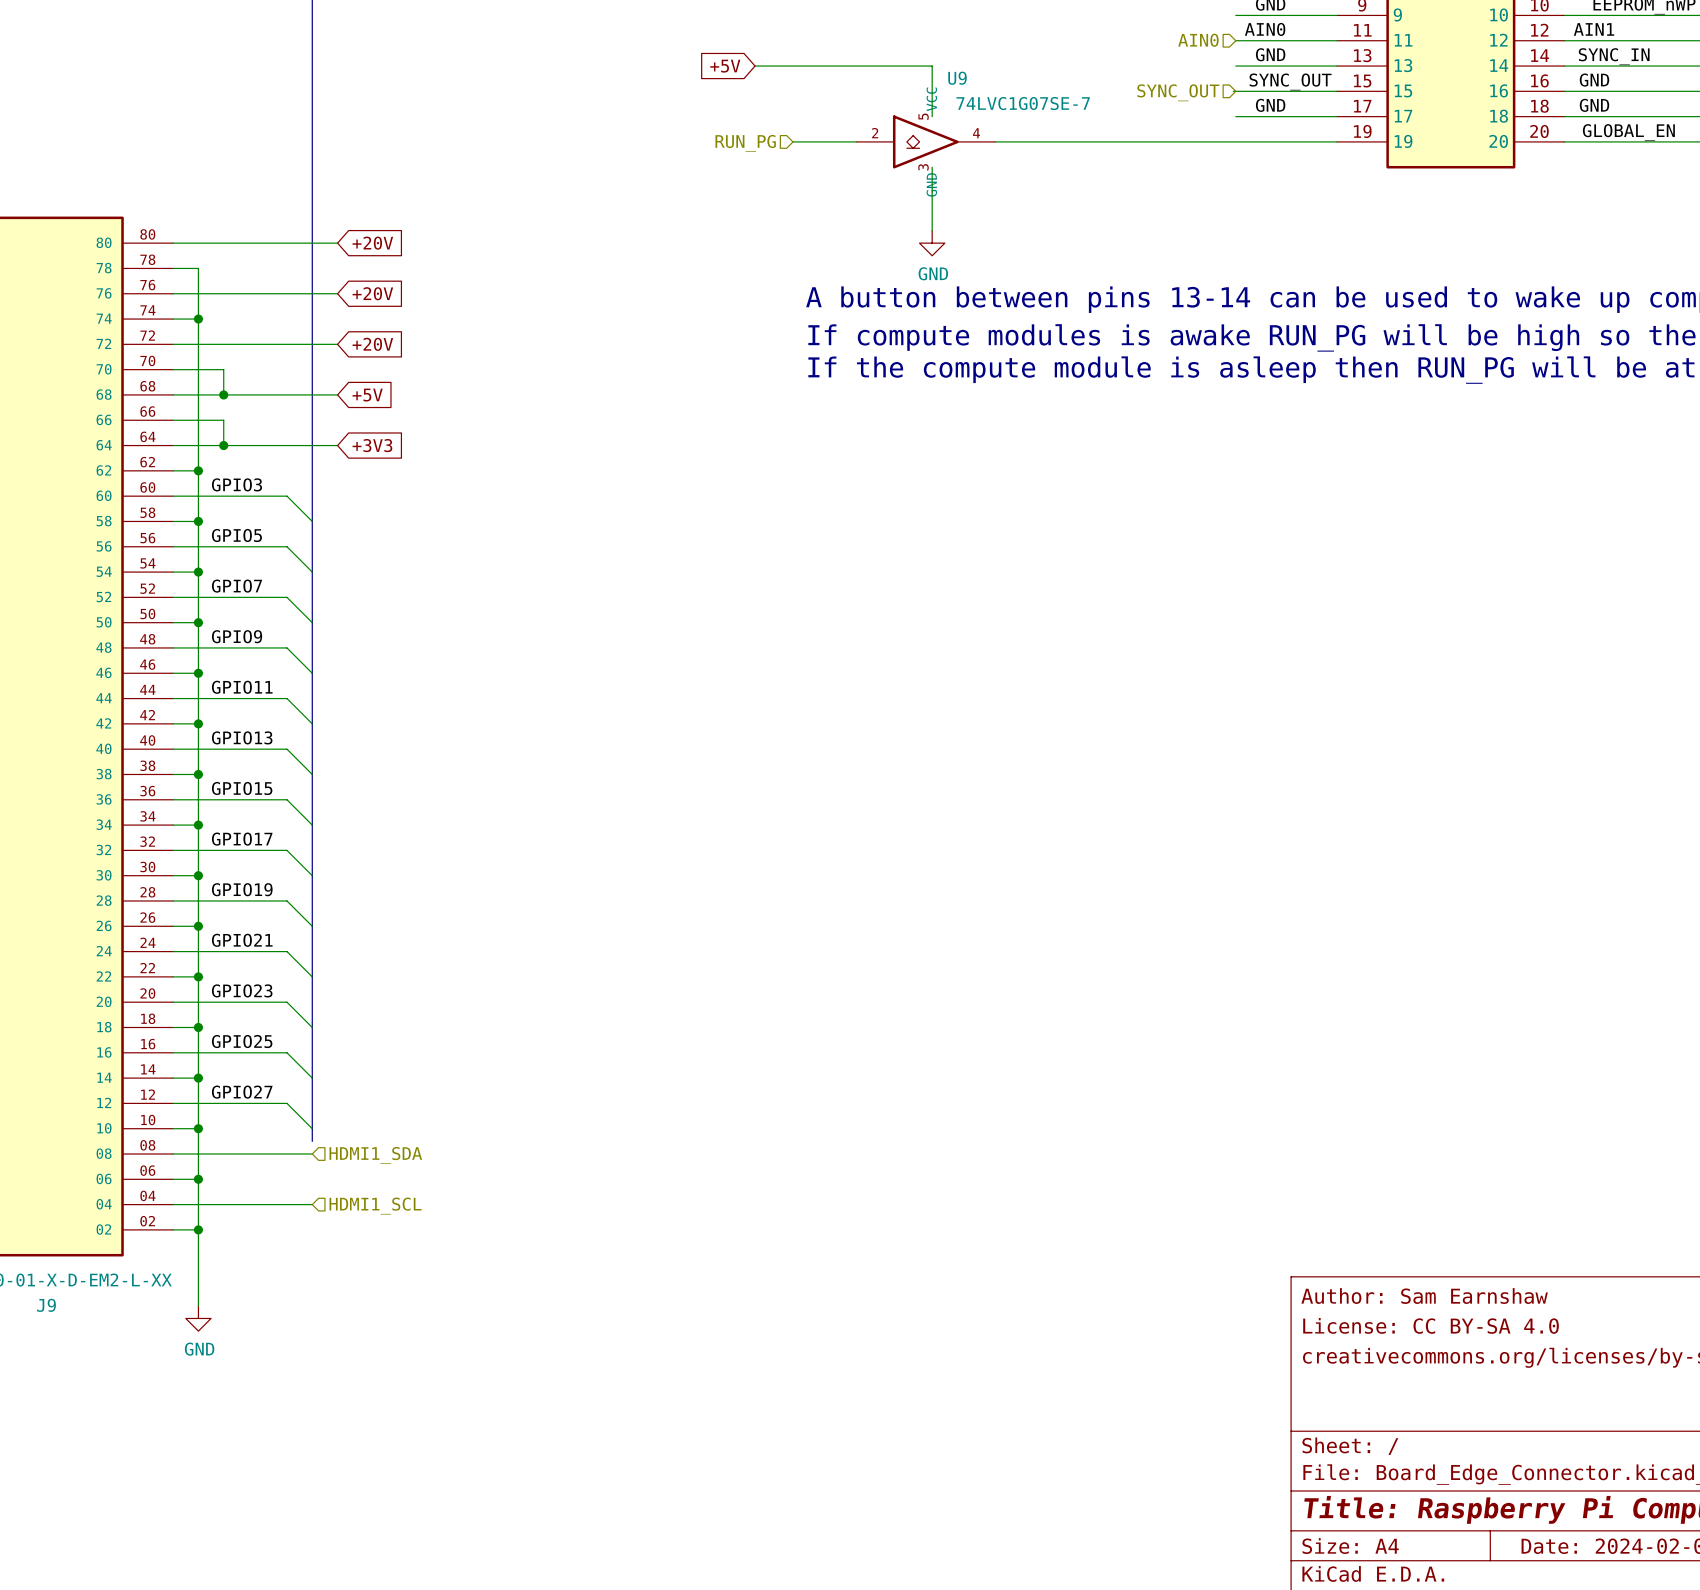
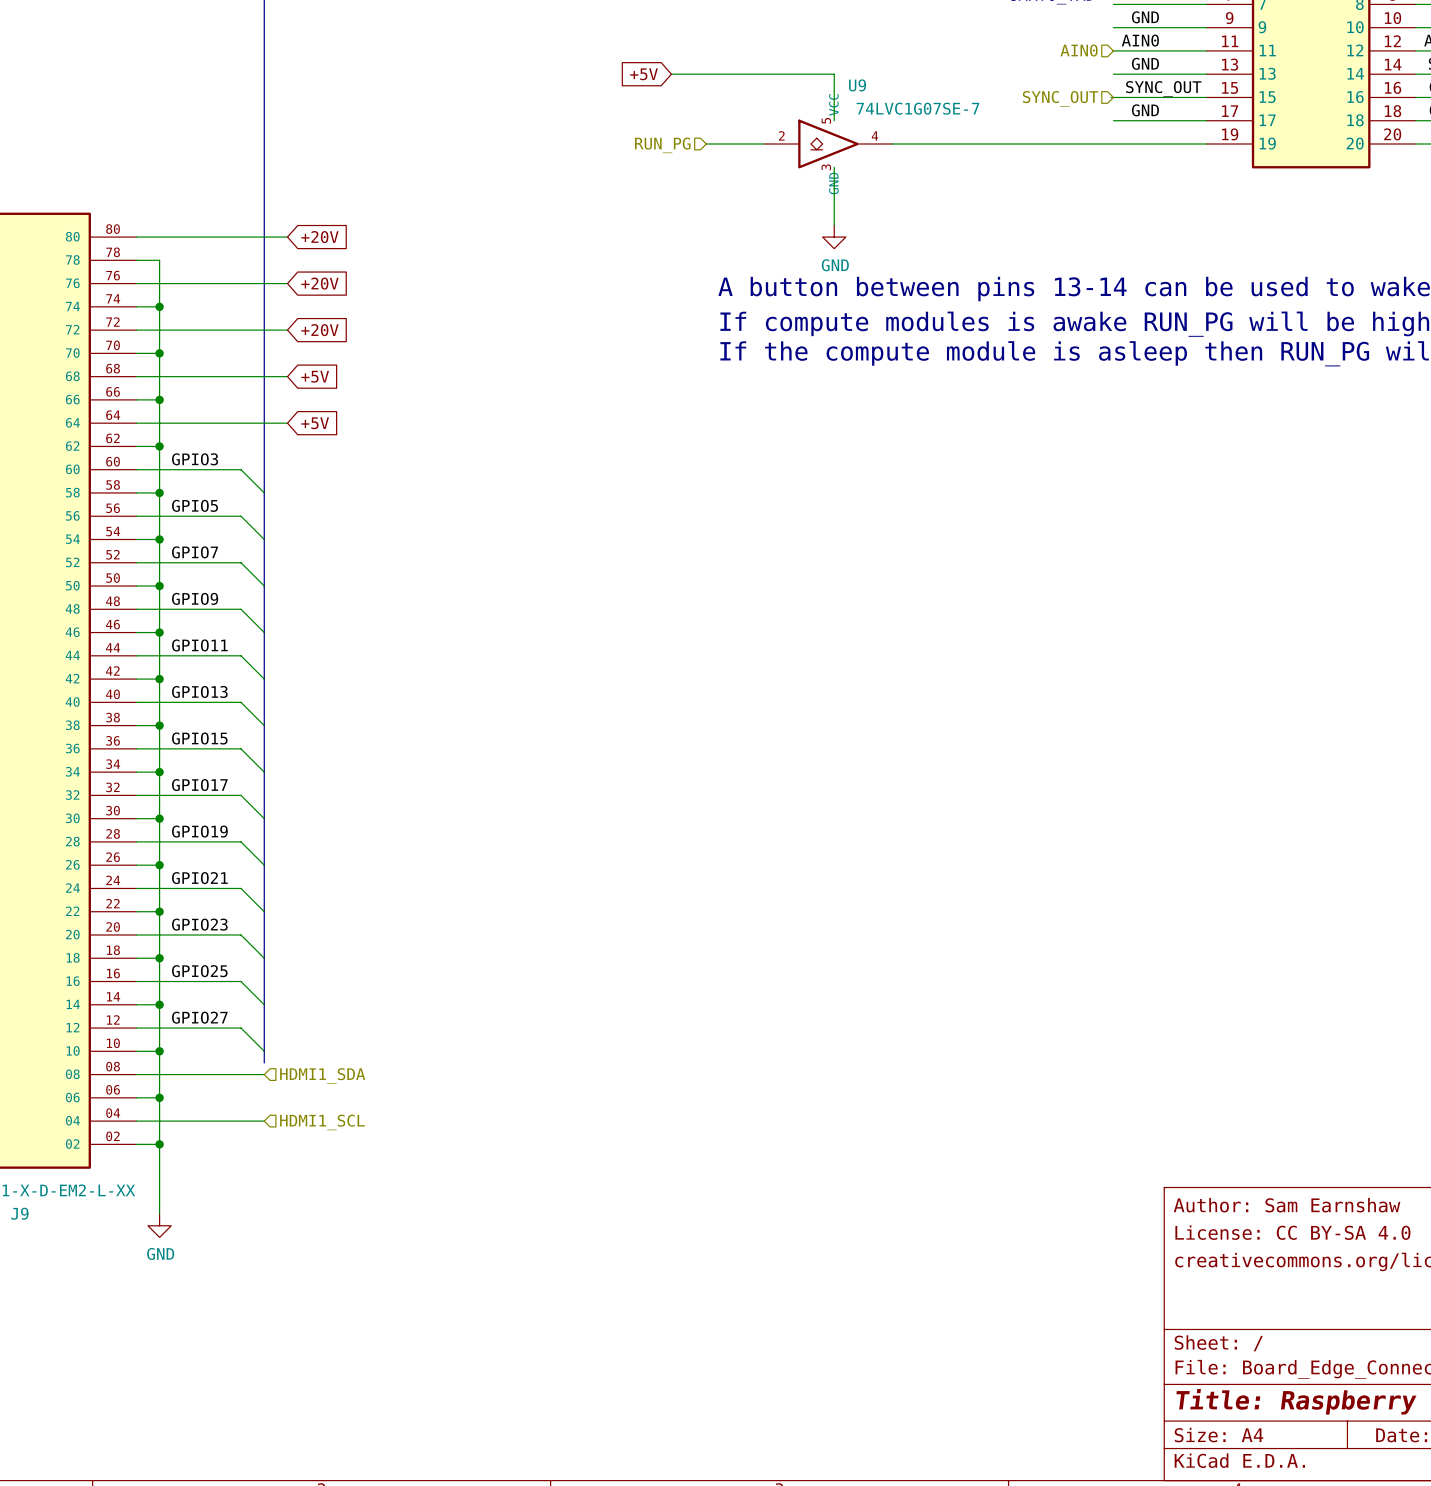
wire: (198, 369) (223, 369) (223, 394) -> none
junction: none -> (159, 353)
junction: (223, 394) -> none
wire: (198, 420) (223, 420) (223, 445) -> none
junction: none -> (159, 399)
junction: (223, 445) -> none
global label: +3V3 (372, 445) -> +5V (315, 423)

